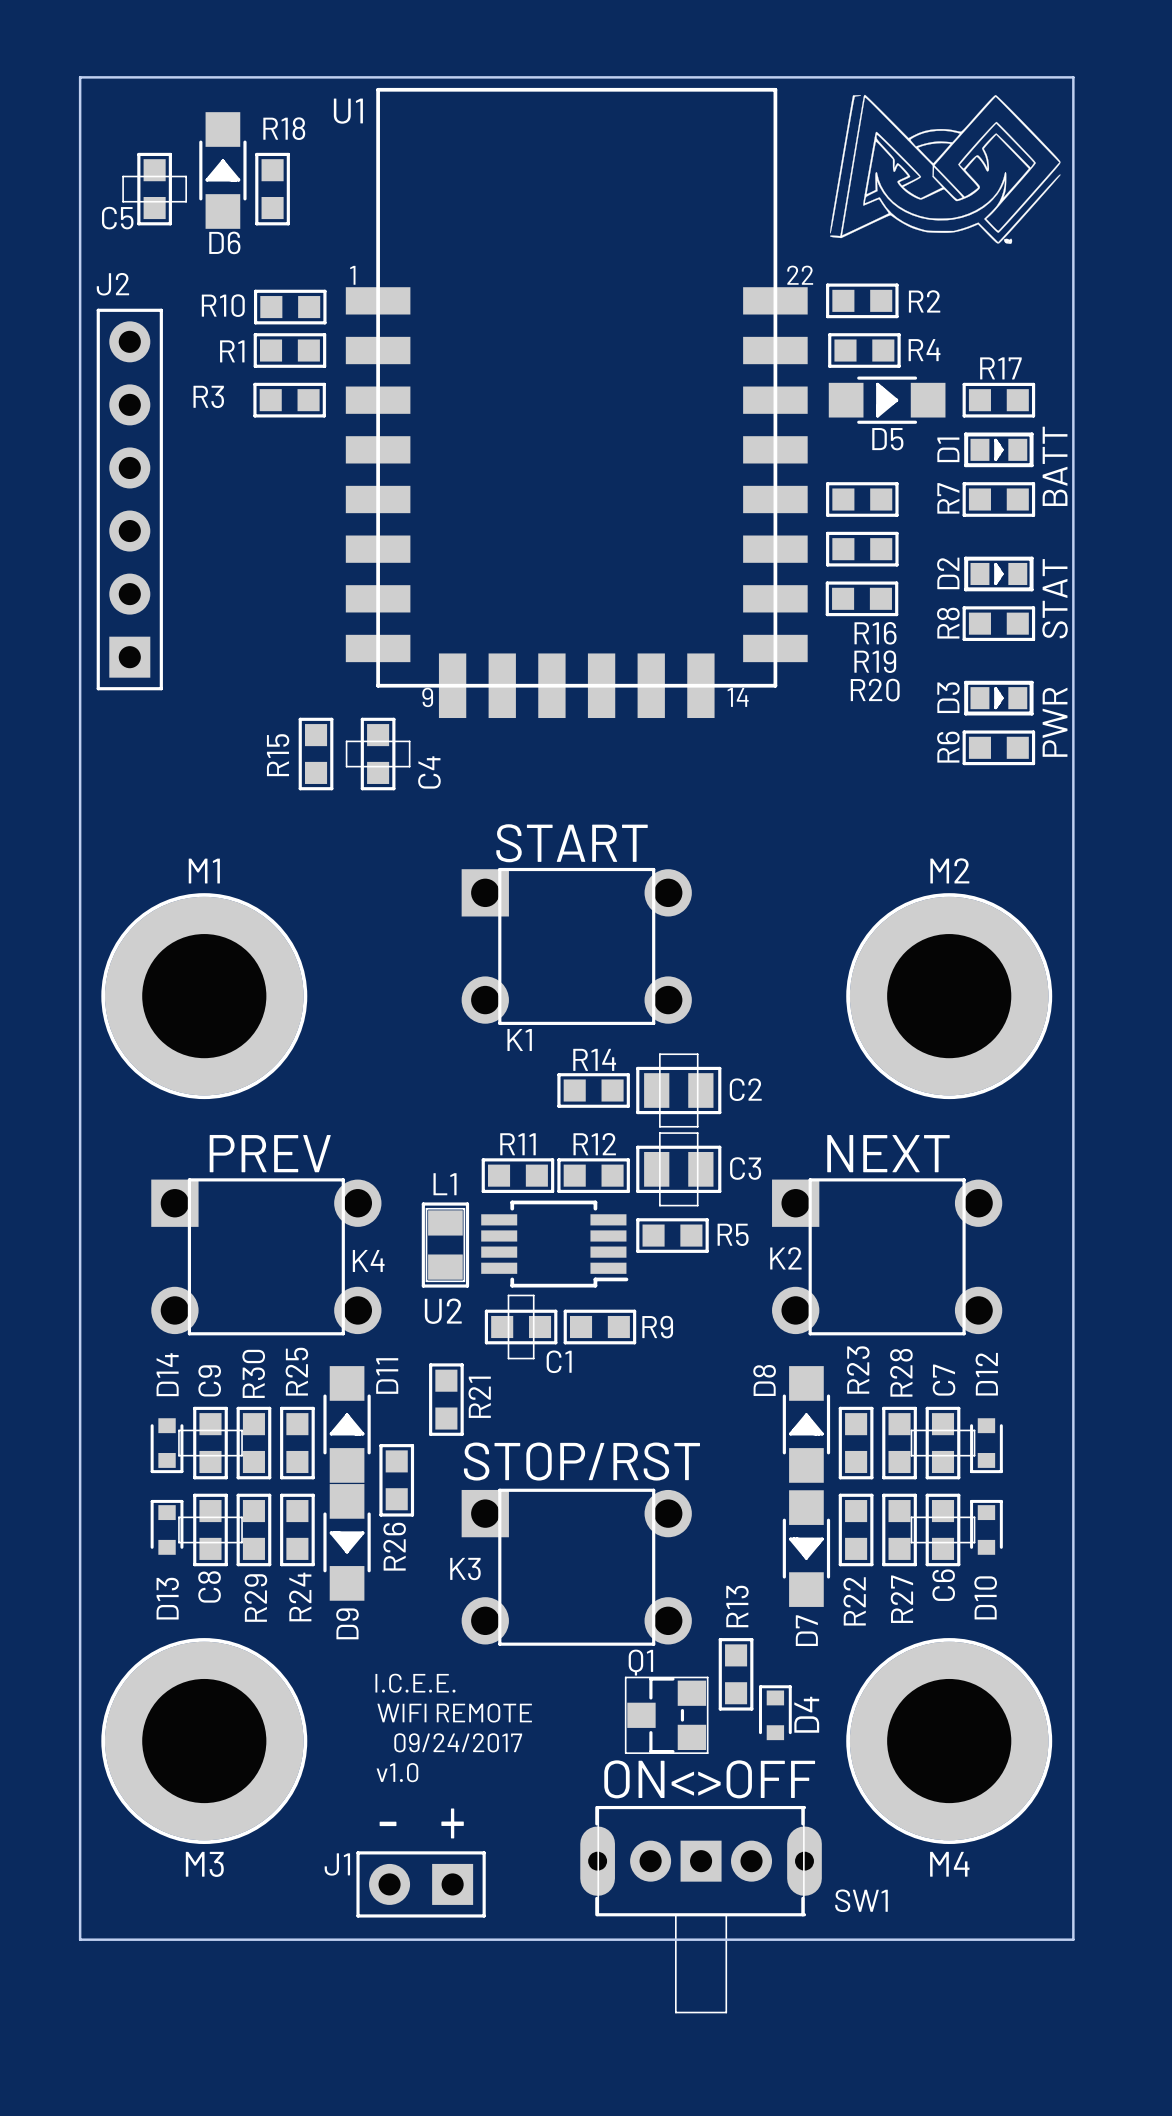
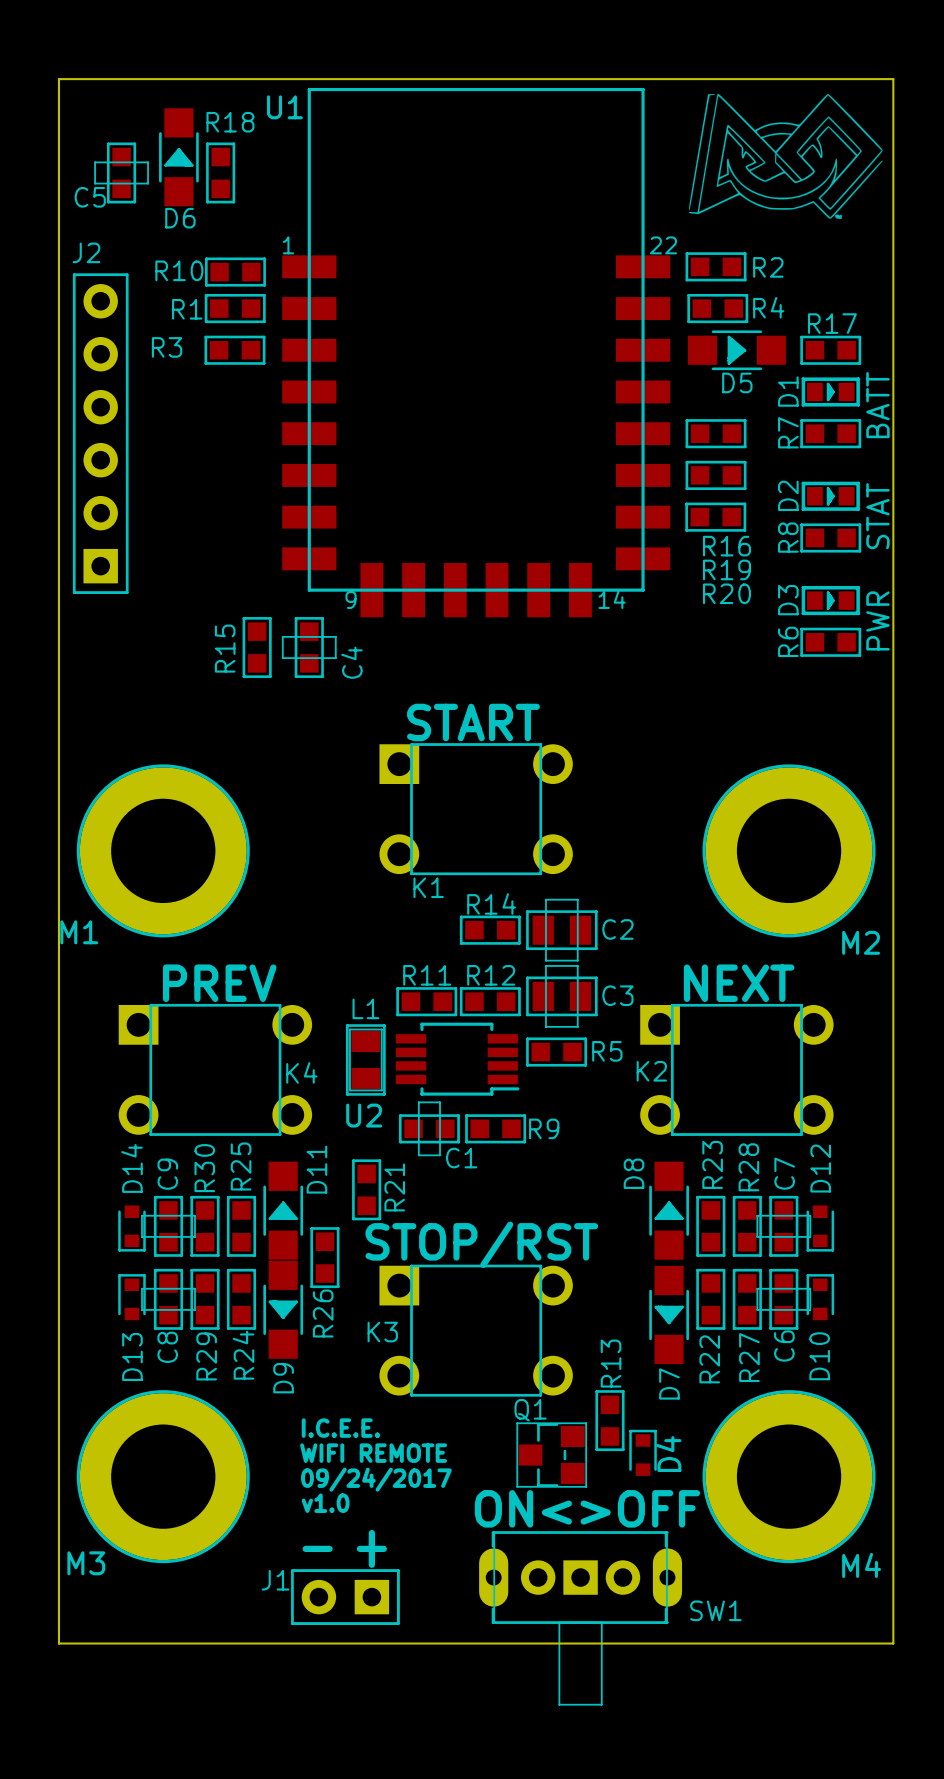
M2 name position: M2 (949, 870) -> M2 (861, 942)
M1 name position: M1 (204, 871) -> M1 (79, 932)
M3 name position: M3 (204, 1864) -> M3 (86, 1563)
M4 name position: M4 (949, 1864) -> M4 (861, 1565)

